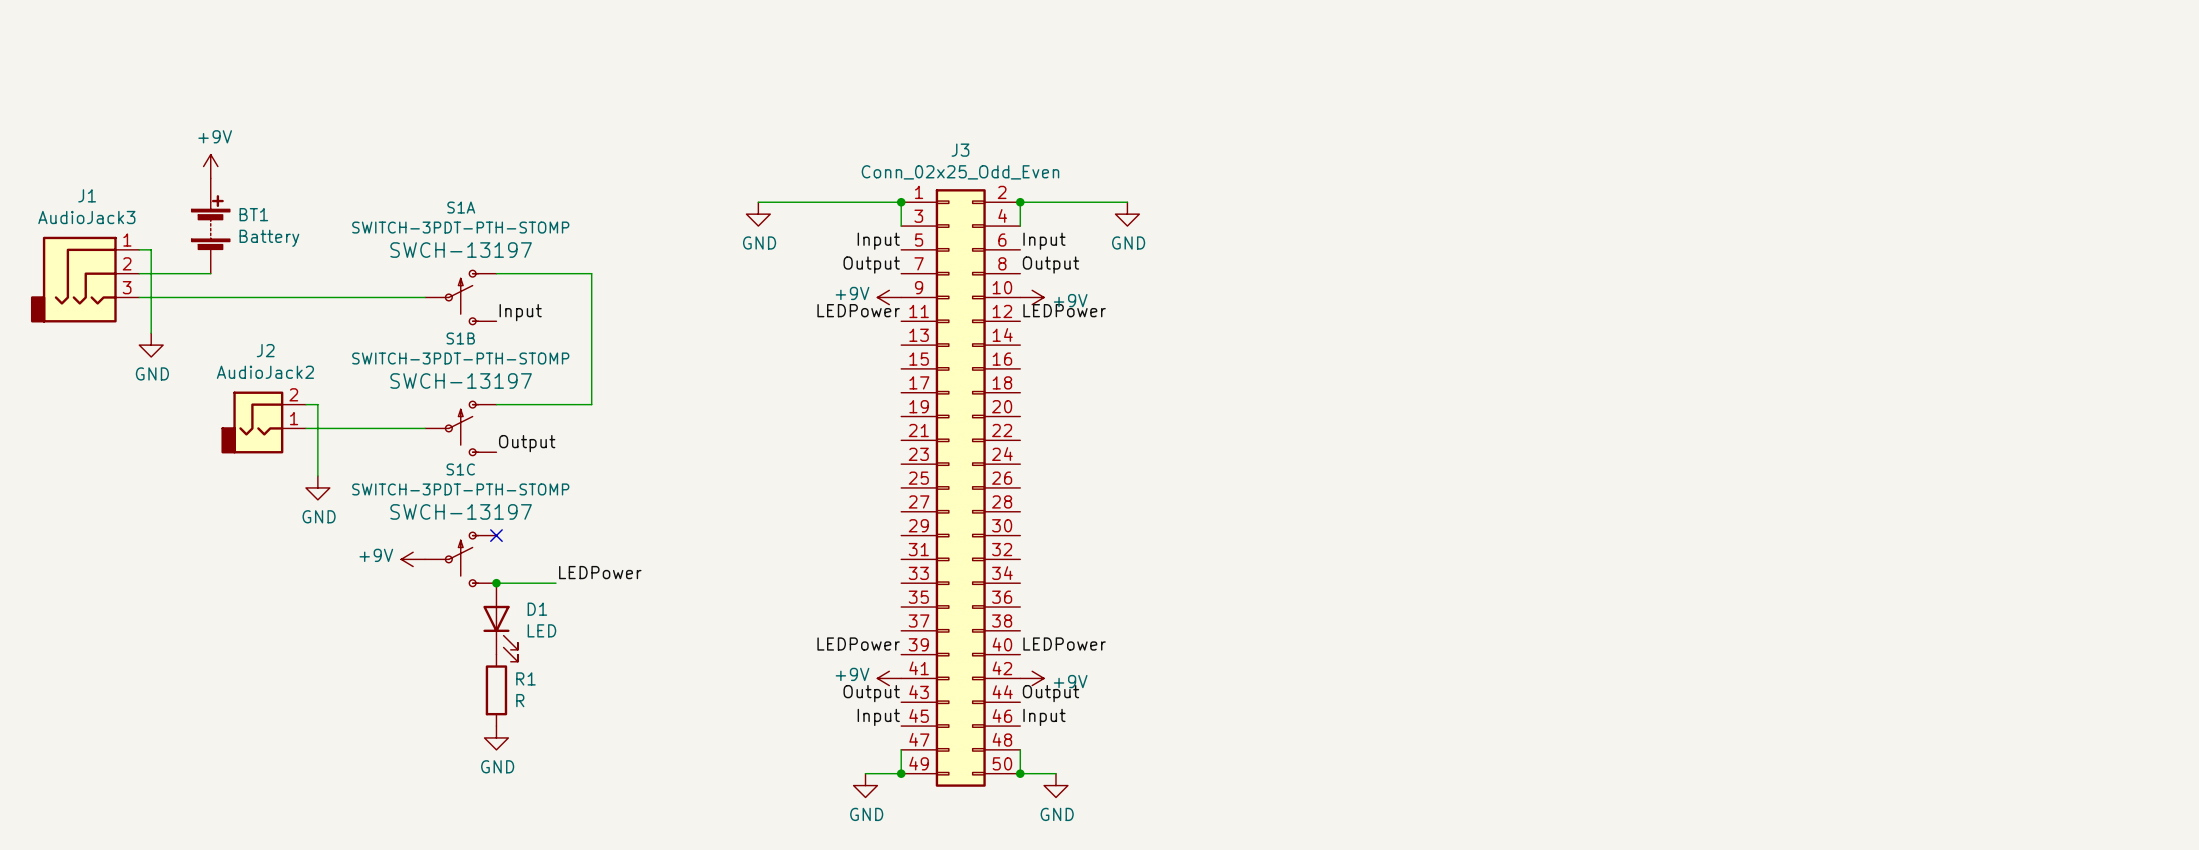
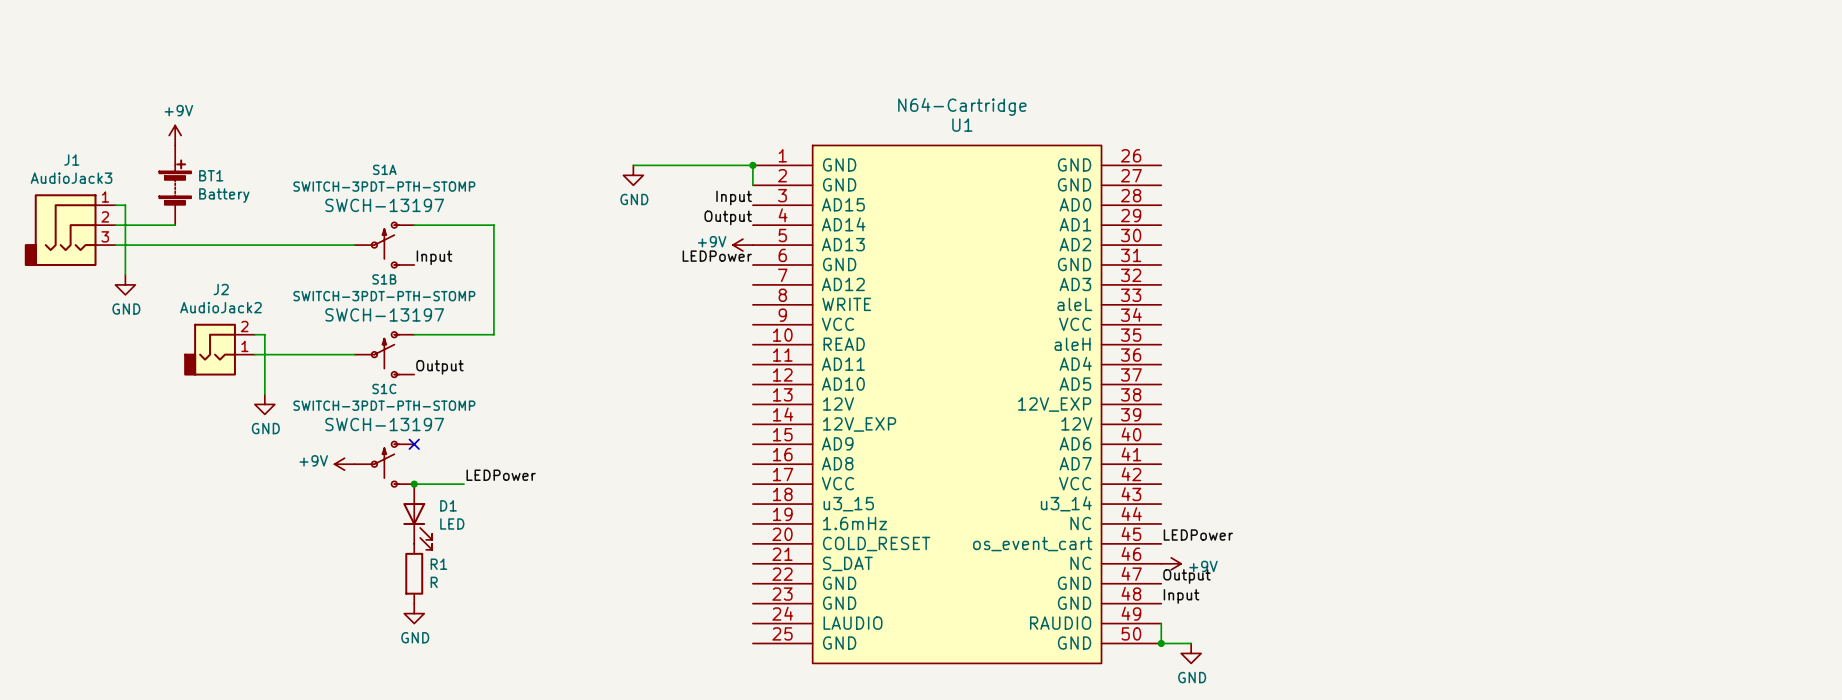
junction: (1020, 202) -> none
power symbol: GND (1127, 214) -> none
label: Input (1044, 241) -> none
label: Output (1050, 265) -> none
power symbol: +9V (1032, 297) -> none
label: LEDPower (1064, 310) -> none
U1: none -> N64-Cartridge (1285, 339)
J3: Conn_02x25_Odd_Even (960, 487) -> none
label: LEDPower (858, 644) -> none
label: LEDPower (1064, 644) -> none
label: none -> LEDPower (1198, 534)
power symbol: +9V (889, 678) -> none
power symbol: +9V (1032, 678) -> none
power symbol: none -> +9V (1171, 563)
label: Output (871, 693) -> none
label: Output (1050, 693) -> none
label: none -> Output (1186, 576)
label: Input (878, 717) -> none
label: Input (1044, 717) -> none
label: none -> Input (1181, 596)
wire: (901, 749) (901, 773) (865, 773) -> none
wire: none -> (1161, 623) (1161, 643) (1191, 643)
junction: (901, 773) -> none
junction: (1020, 773) -> none
junction: none -> (1161, 643)
power symbol: GND (865, 785) -> none
power symbol: GND (1055, 785) -> none
power symbol: none -> GND (1191, 653)

